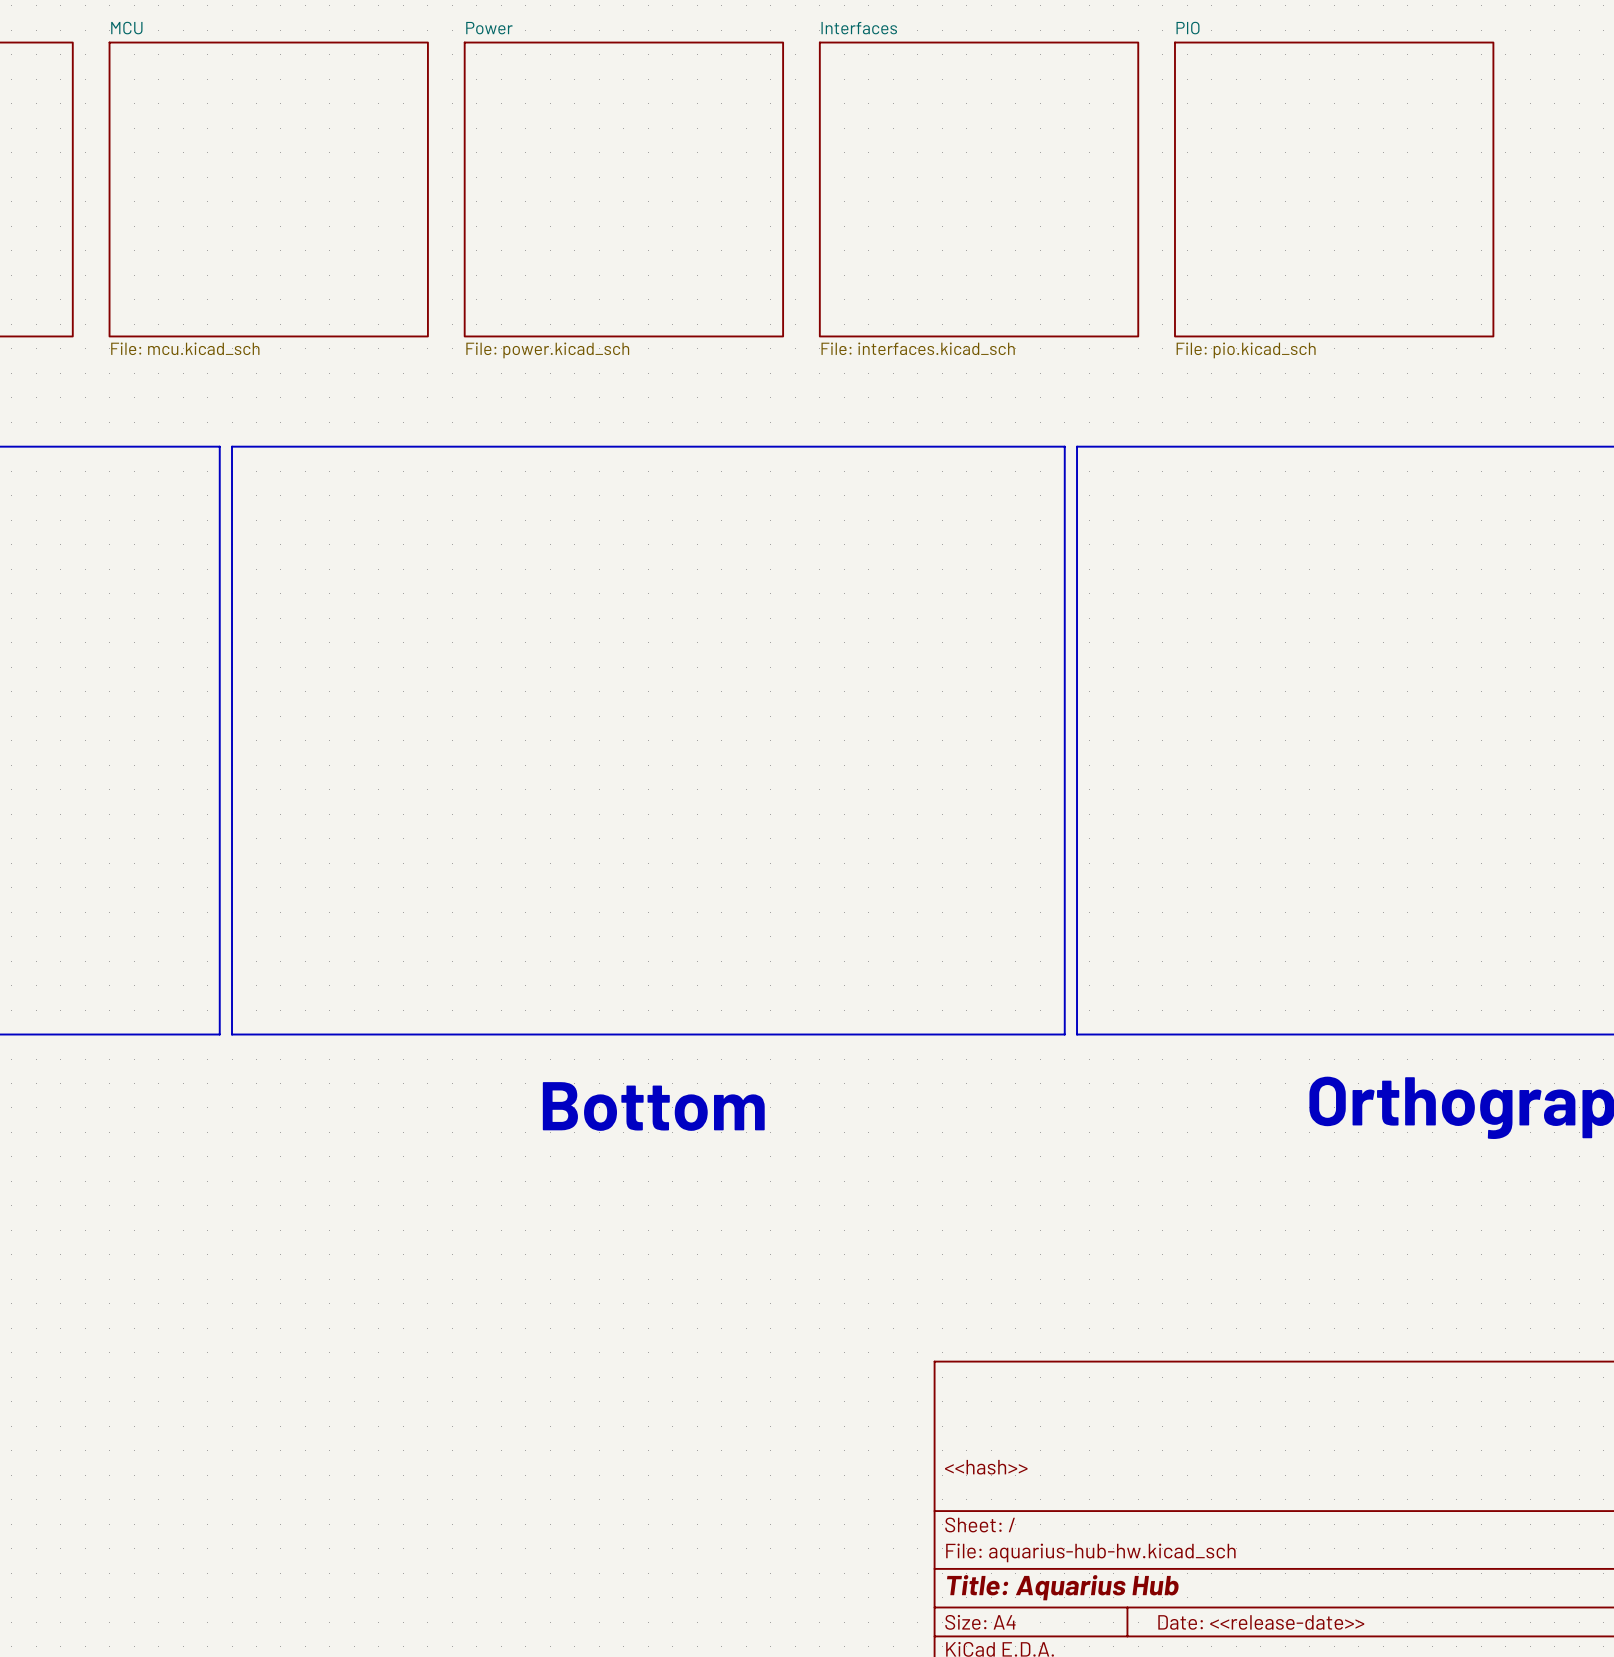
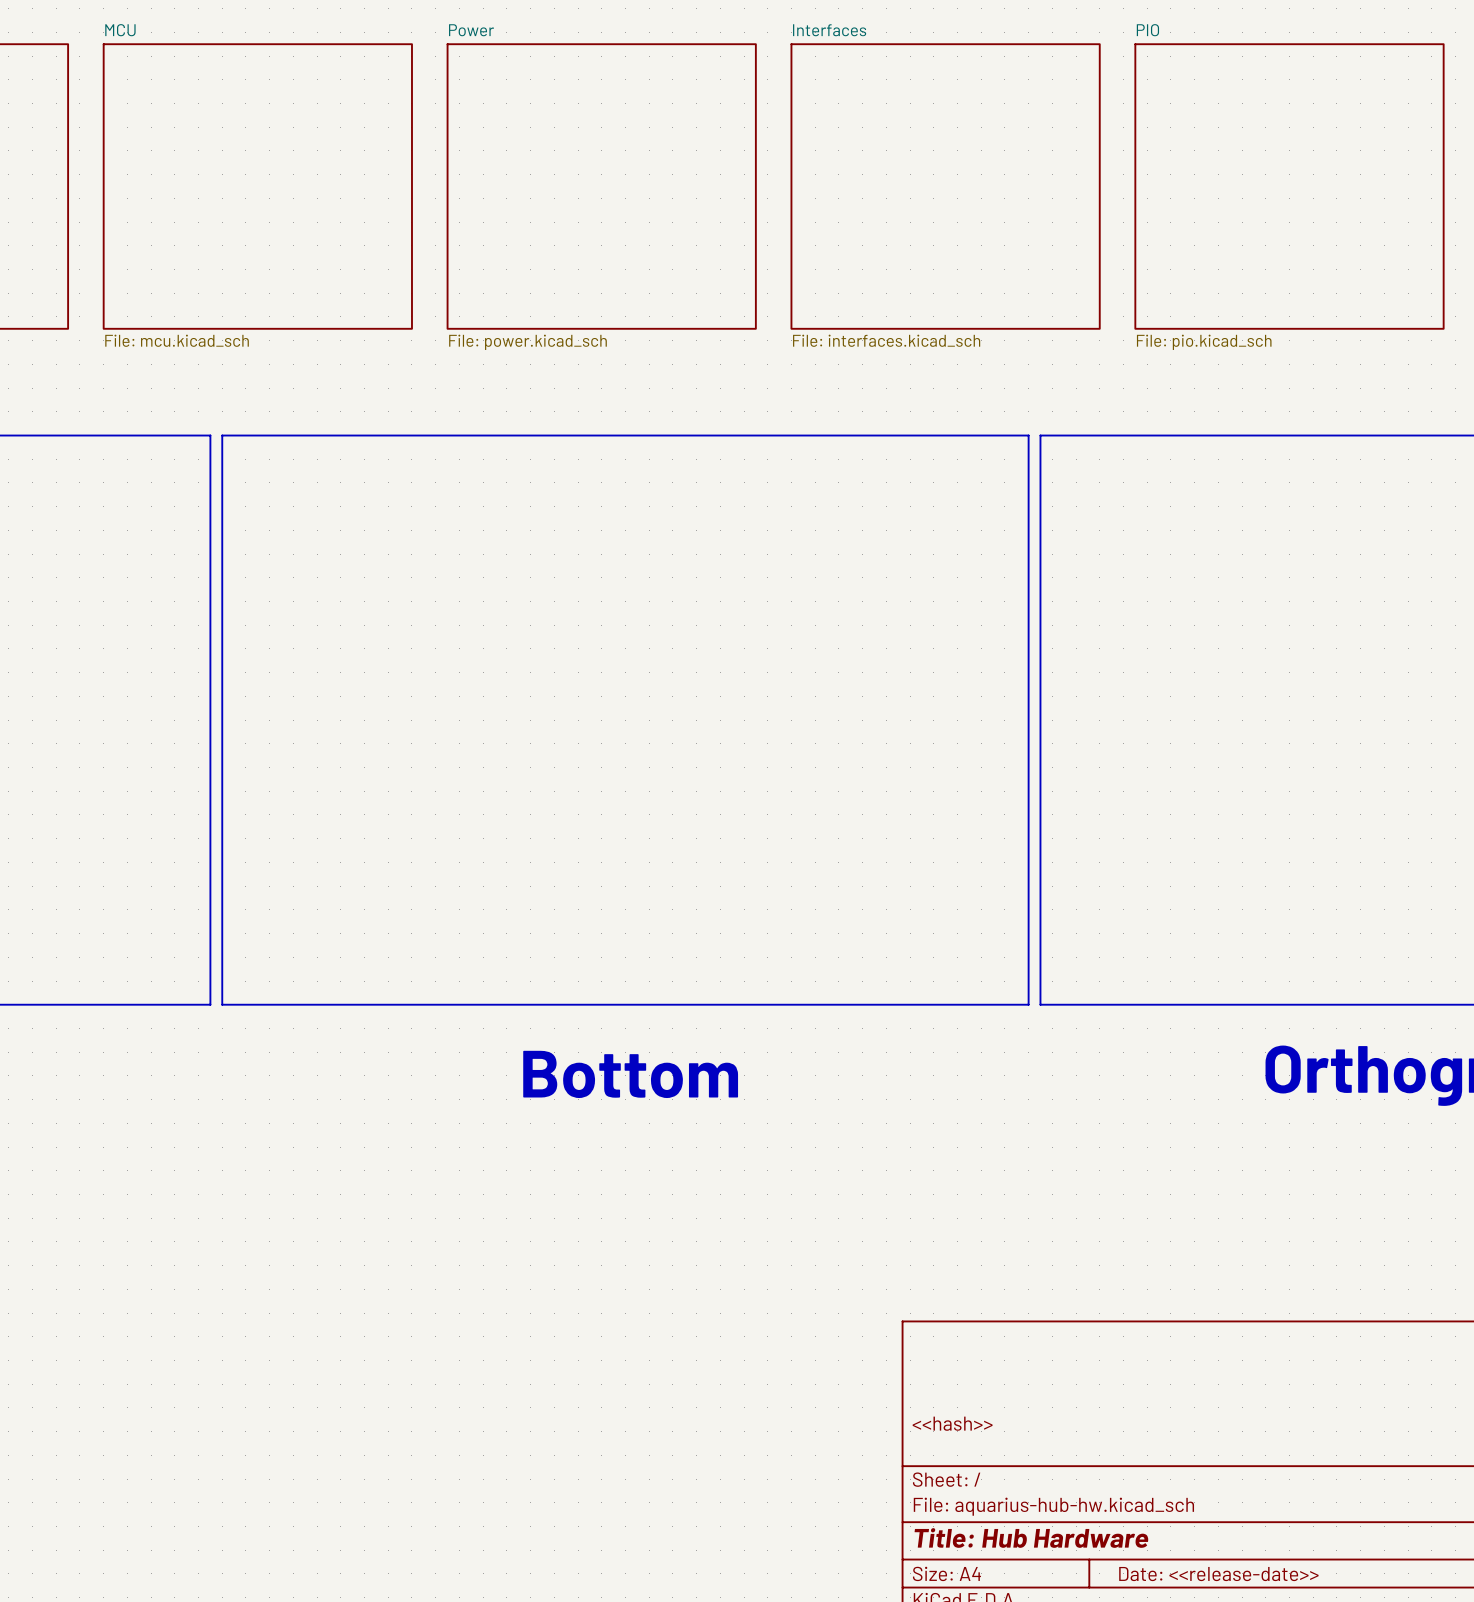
title block: Title: Aquarius Hub (1062, 1587) -> Title: Hub Hardware (1031, 1538)

